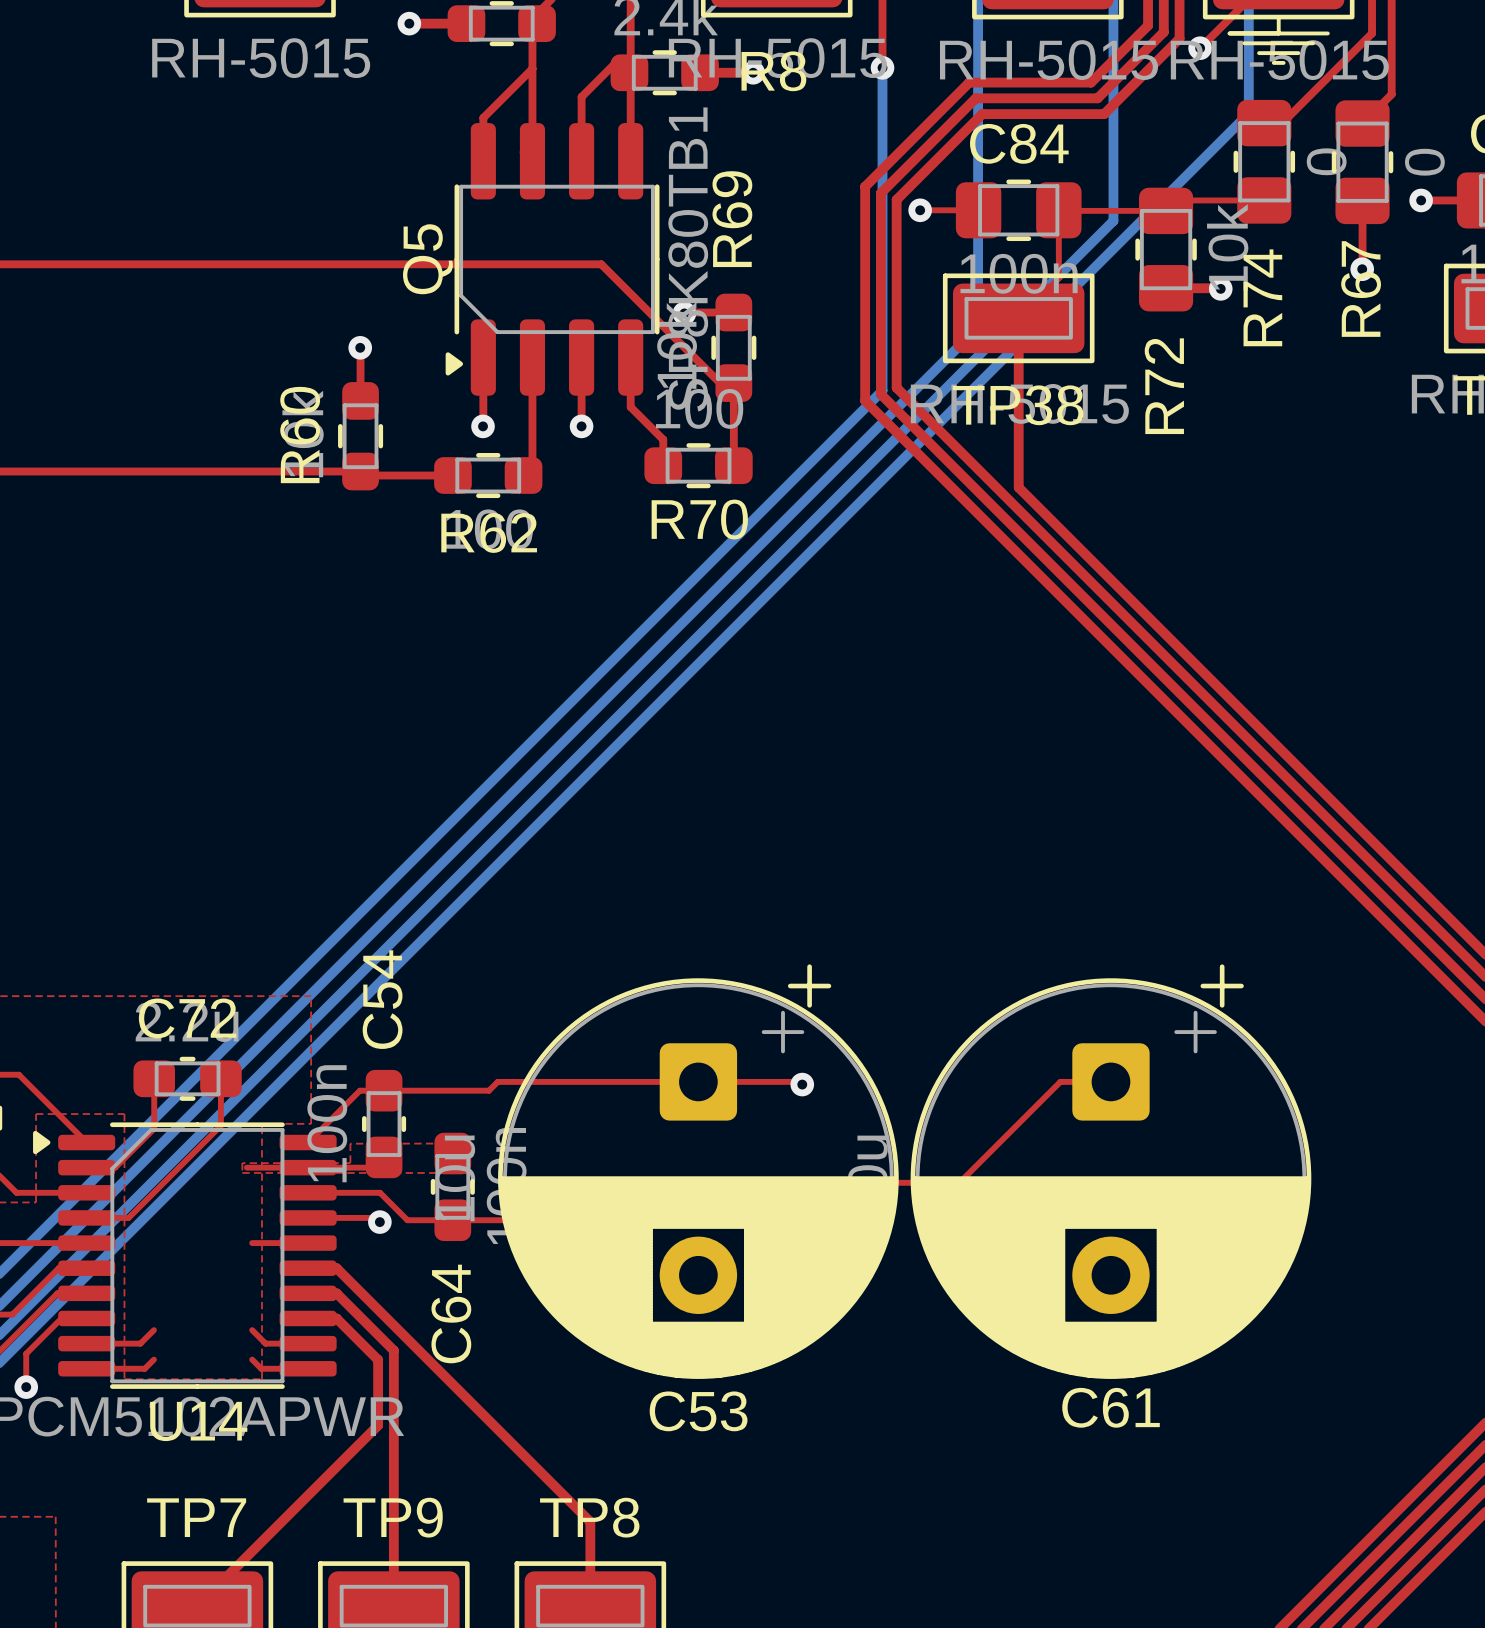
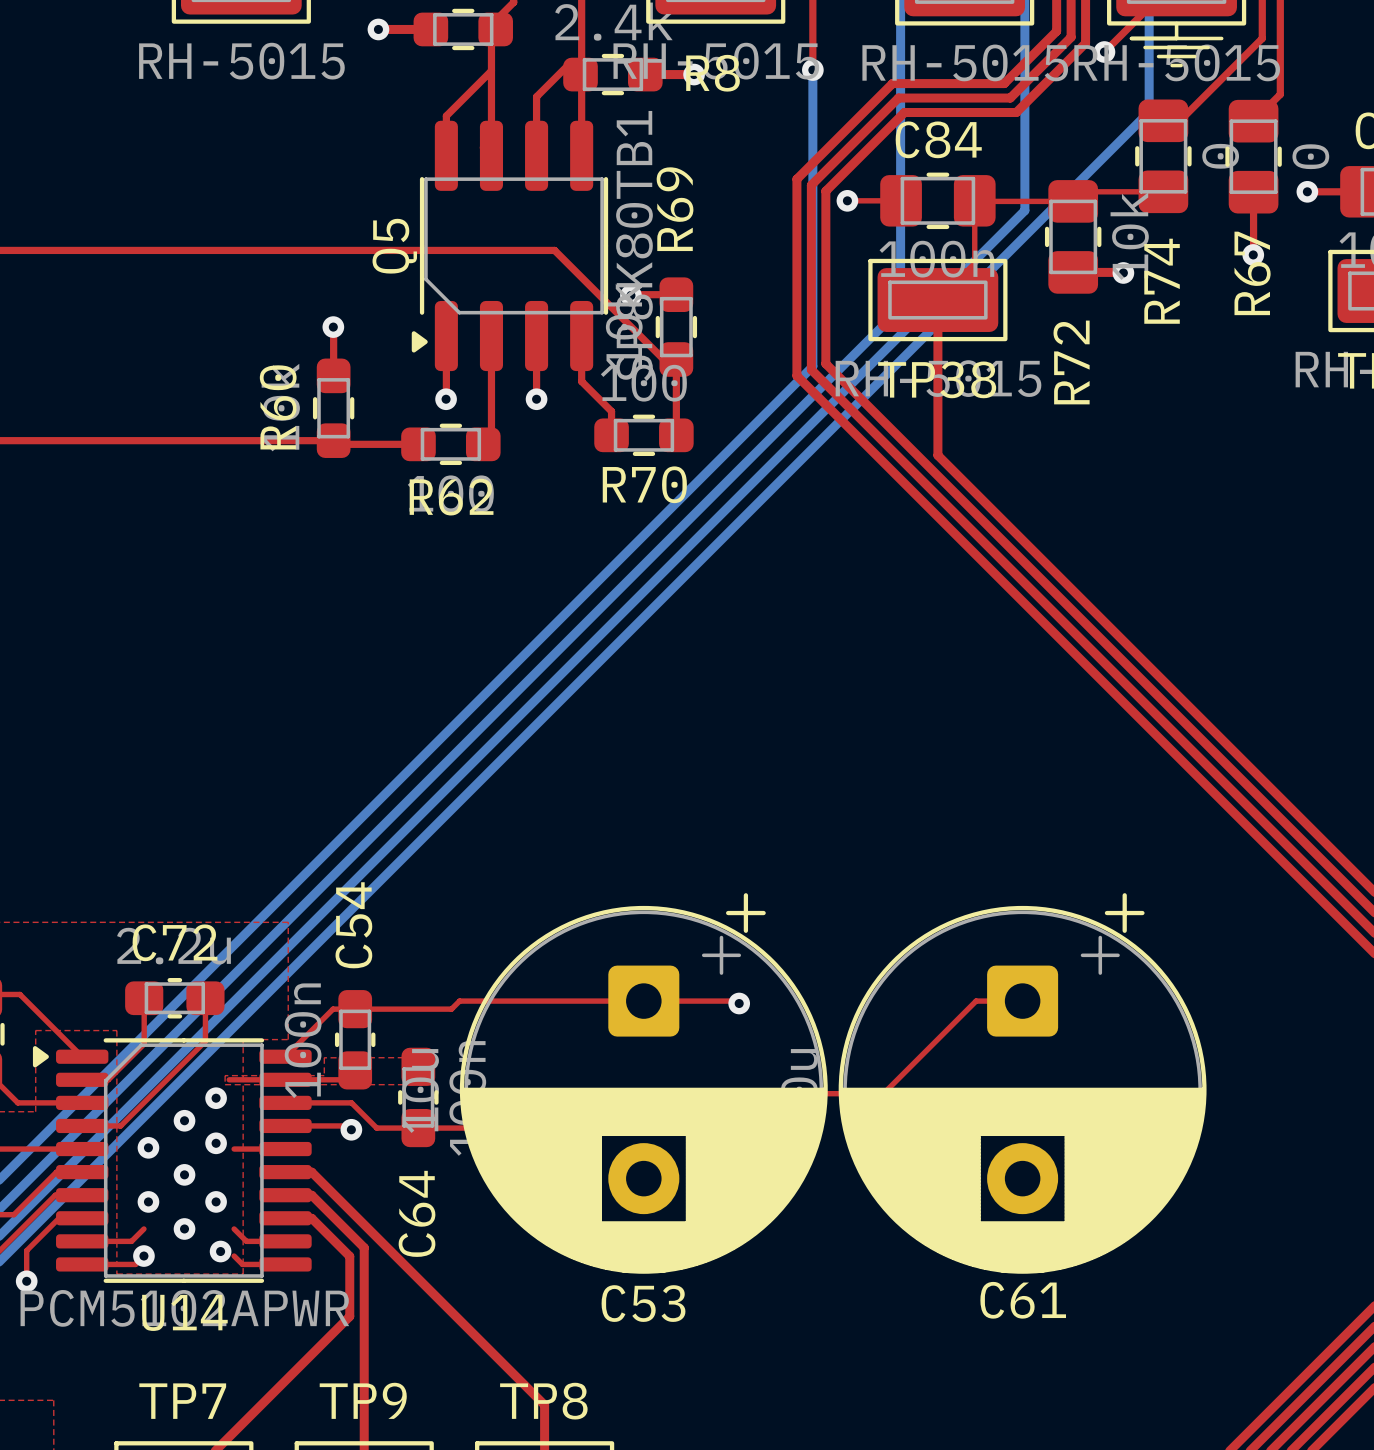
via: none -> (216, 1098)
via: none -> (184, 1120)
via: none -> (216, 1143)
via: none -> (148, 1147)
via: none -> (184, 1174)
via: none -> (148, 1201)
via: none -> (216, 1201)
via: none -> (184, 1228)
via: none -> (220, 1251)
via: none -> (143, 1256)

